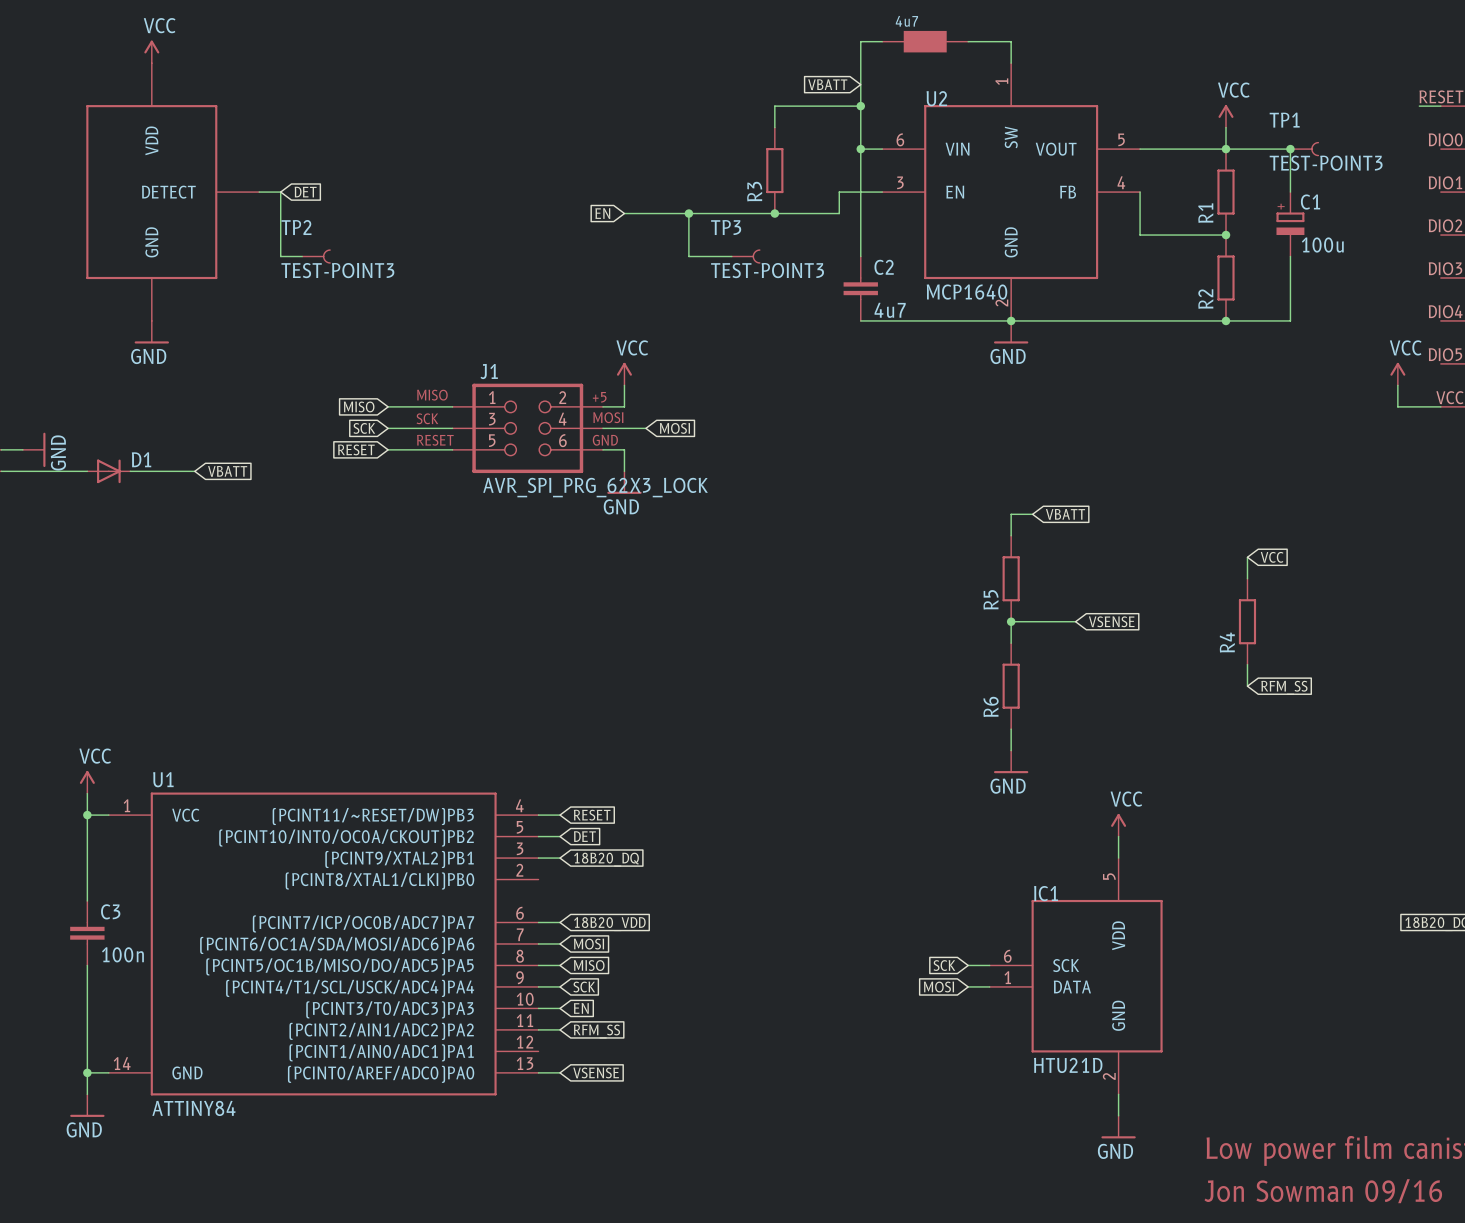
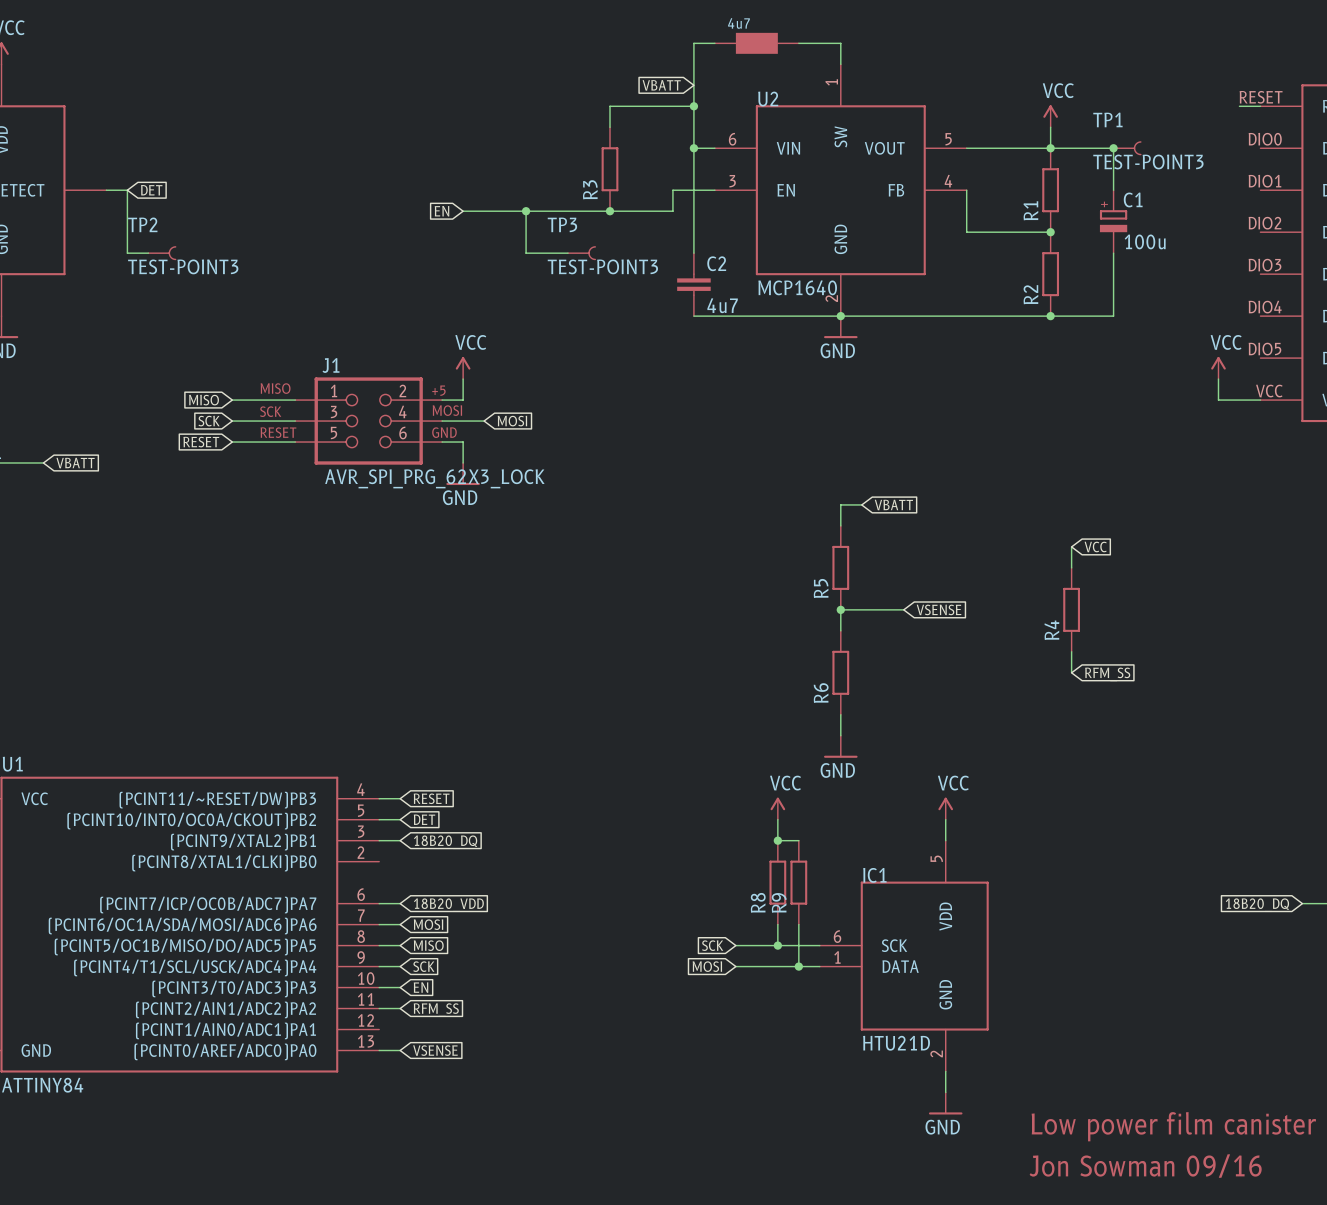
power symbol: none -> VCC (777, 808)
wire: none -> (777, 819) (777, 840) (798, 840)
junction: none -> (777, 840)
R8: none -> (777, 882)
R9: none -> (798, 882)
wire: none -> (777, 924) (777, 945)
wire: none -> (798, 924) (798, 966) (735, 966)
wire: none -> (735, 945) (798, 945)
global label position: SCK (944, 965) -> SCK (712, 945)
junction: none -> (777, 945)
junction: none -> (798, 966)
global label position: MOSI (938, 987) -> MOSI (707, 966)

